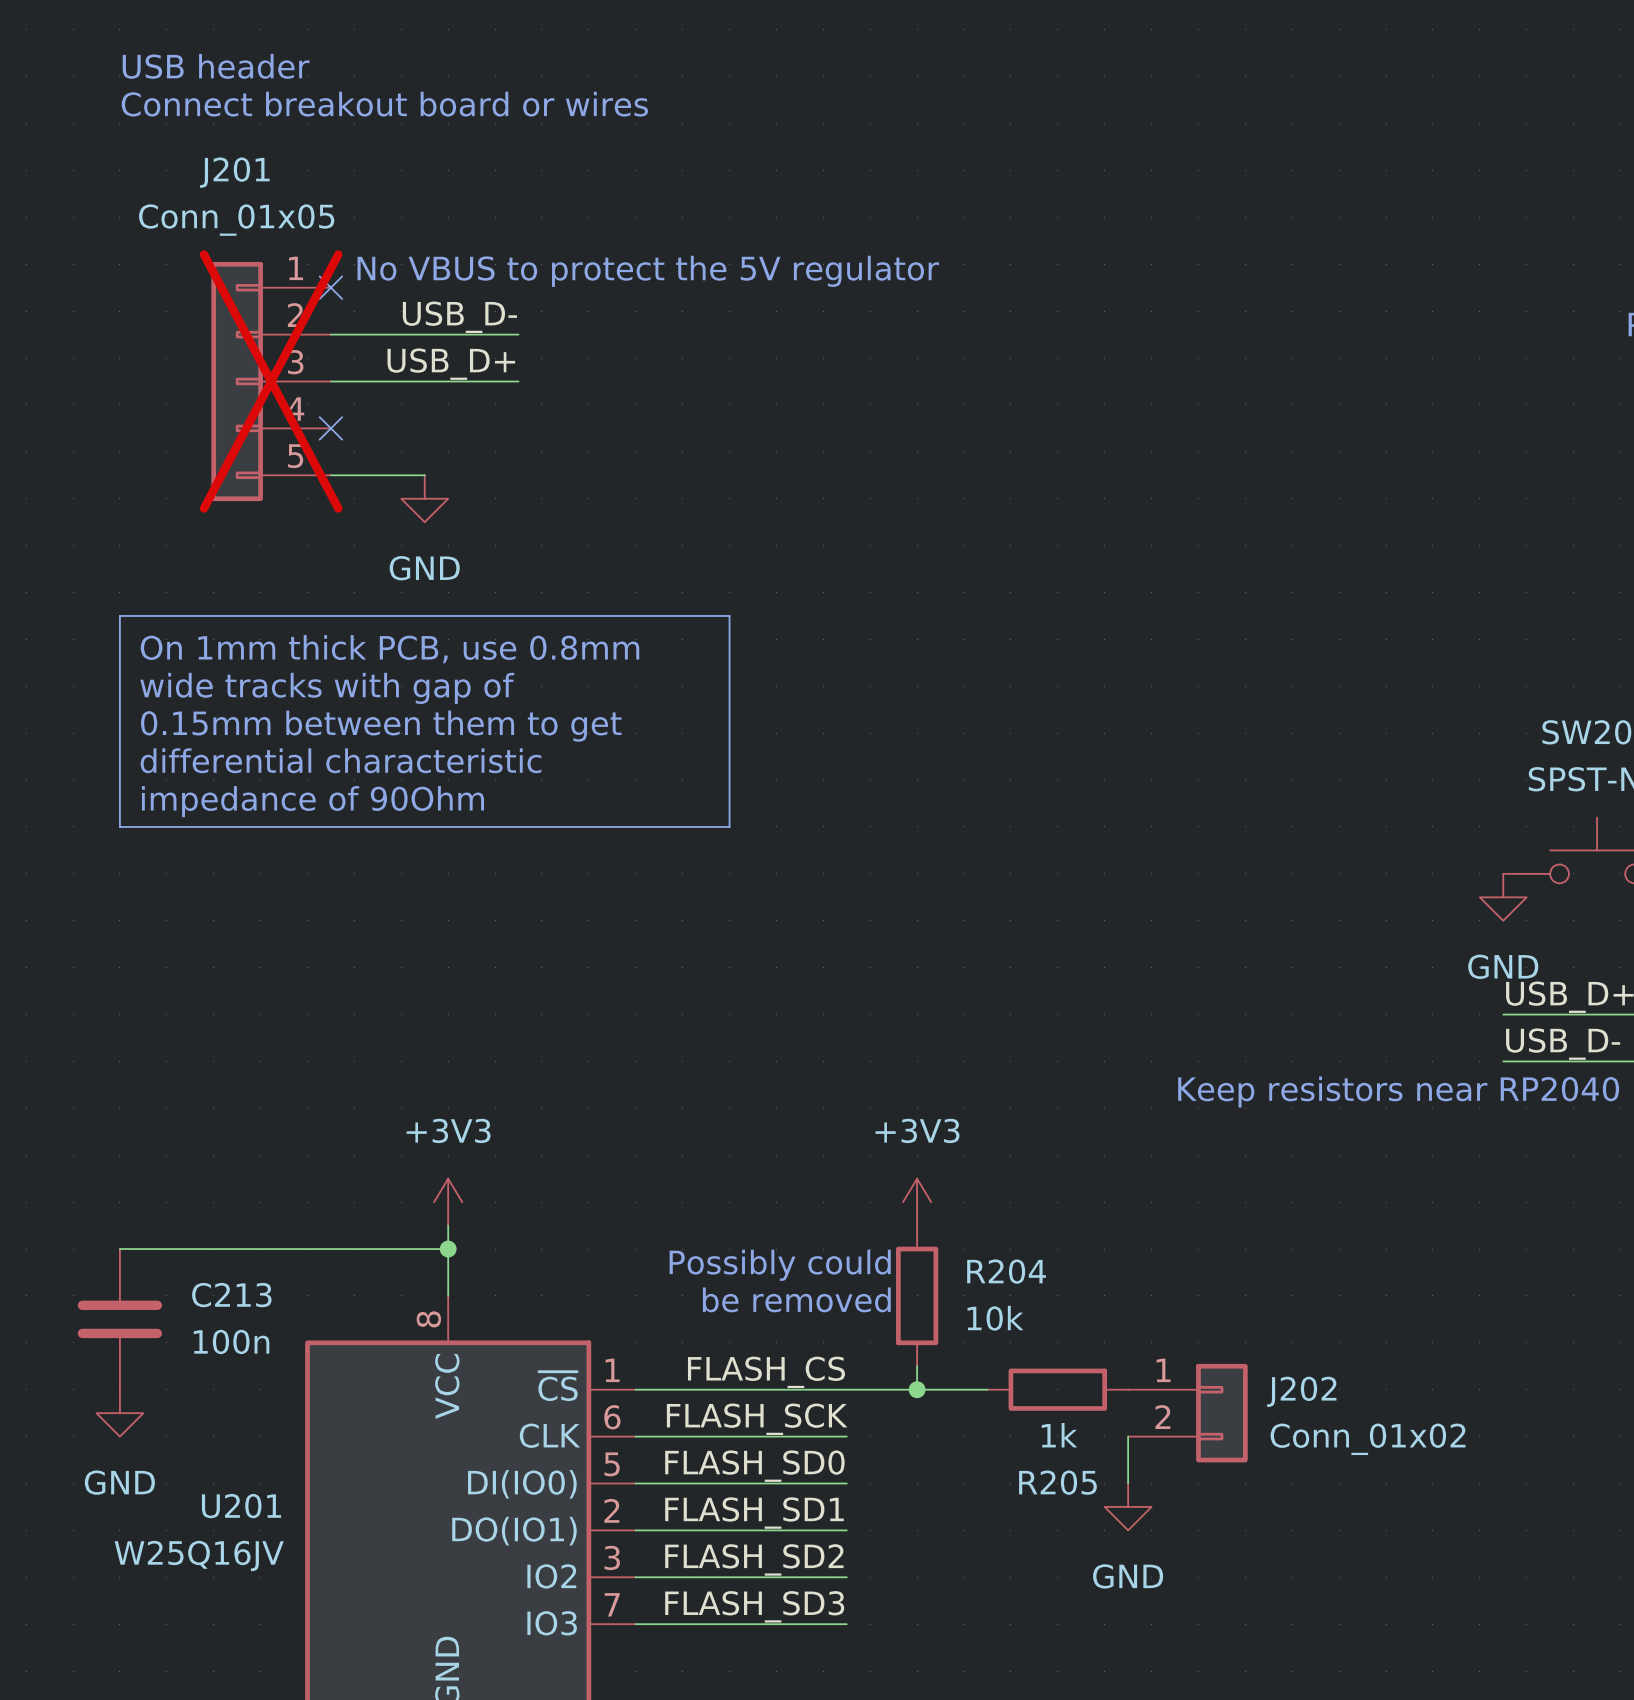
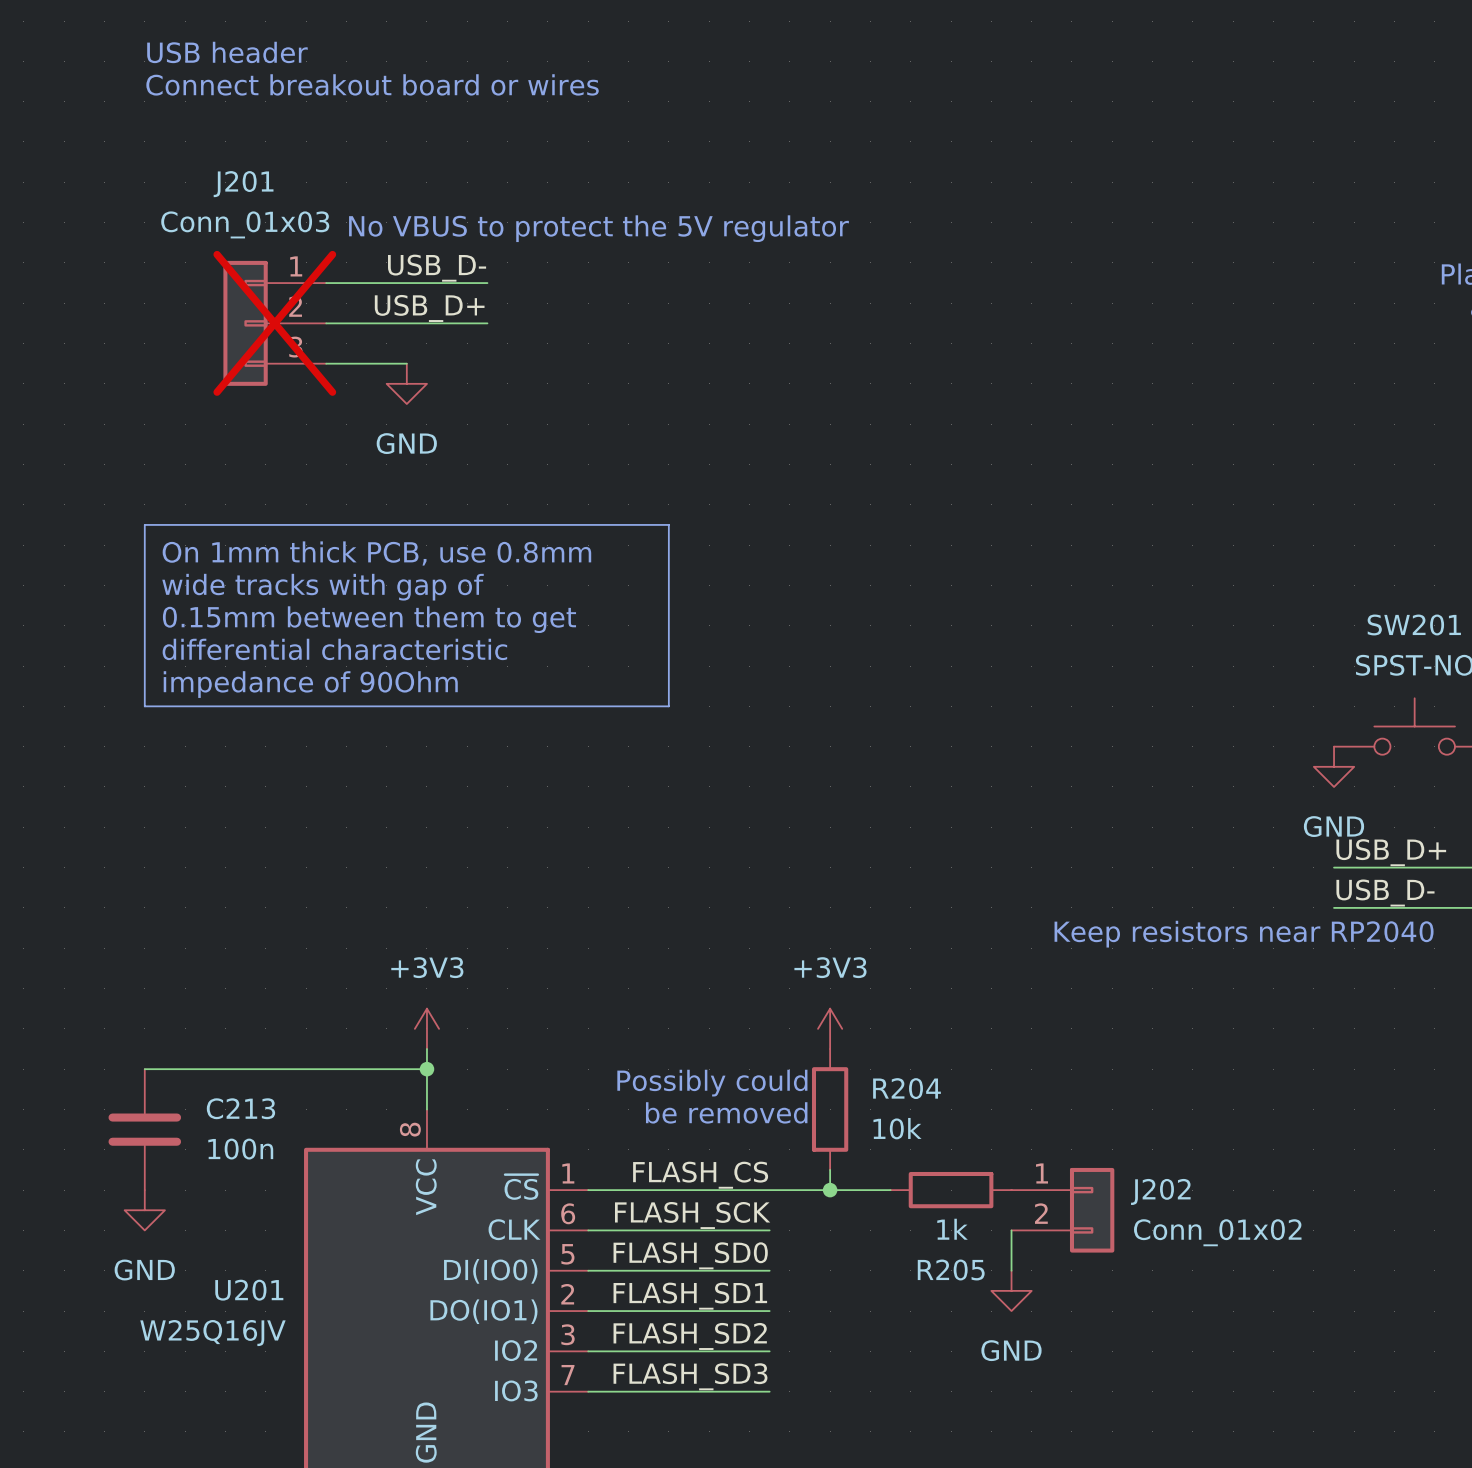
J201 name position: J201 (234, 172) -> J201 (243, 184)
J201 value: Conn_01x05 (236, 220) -> Conn_01x03 (245, 224)
J201 symbol: [211, 261, 331, 502] -> [223, 260, 327, 386]
no-connect mark: (330, 287) -> none
no-connect mark: (330, 428) -> none
wire: (330, 475) (424, 475) -> (326, 363) (406, 363)
power symbol position: GND (424, 498) -> GND (406, 383)

